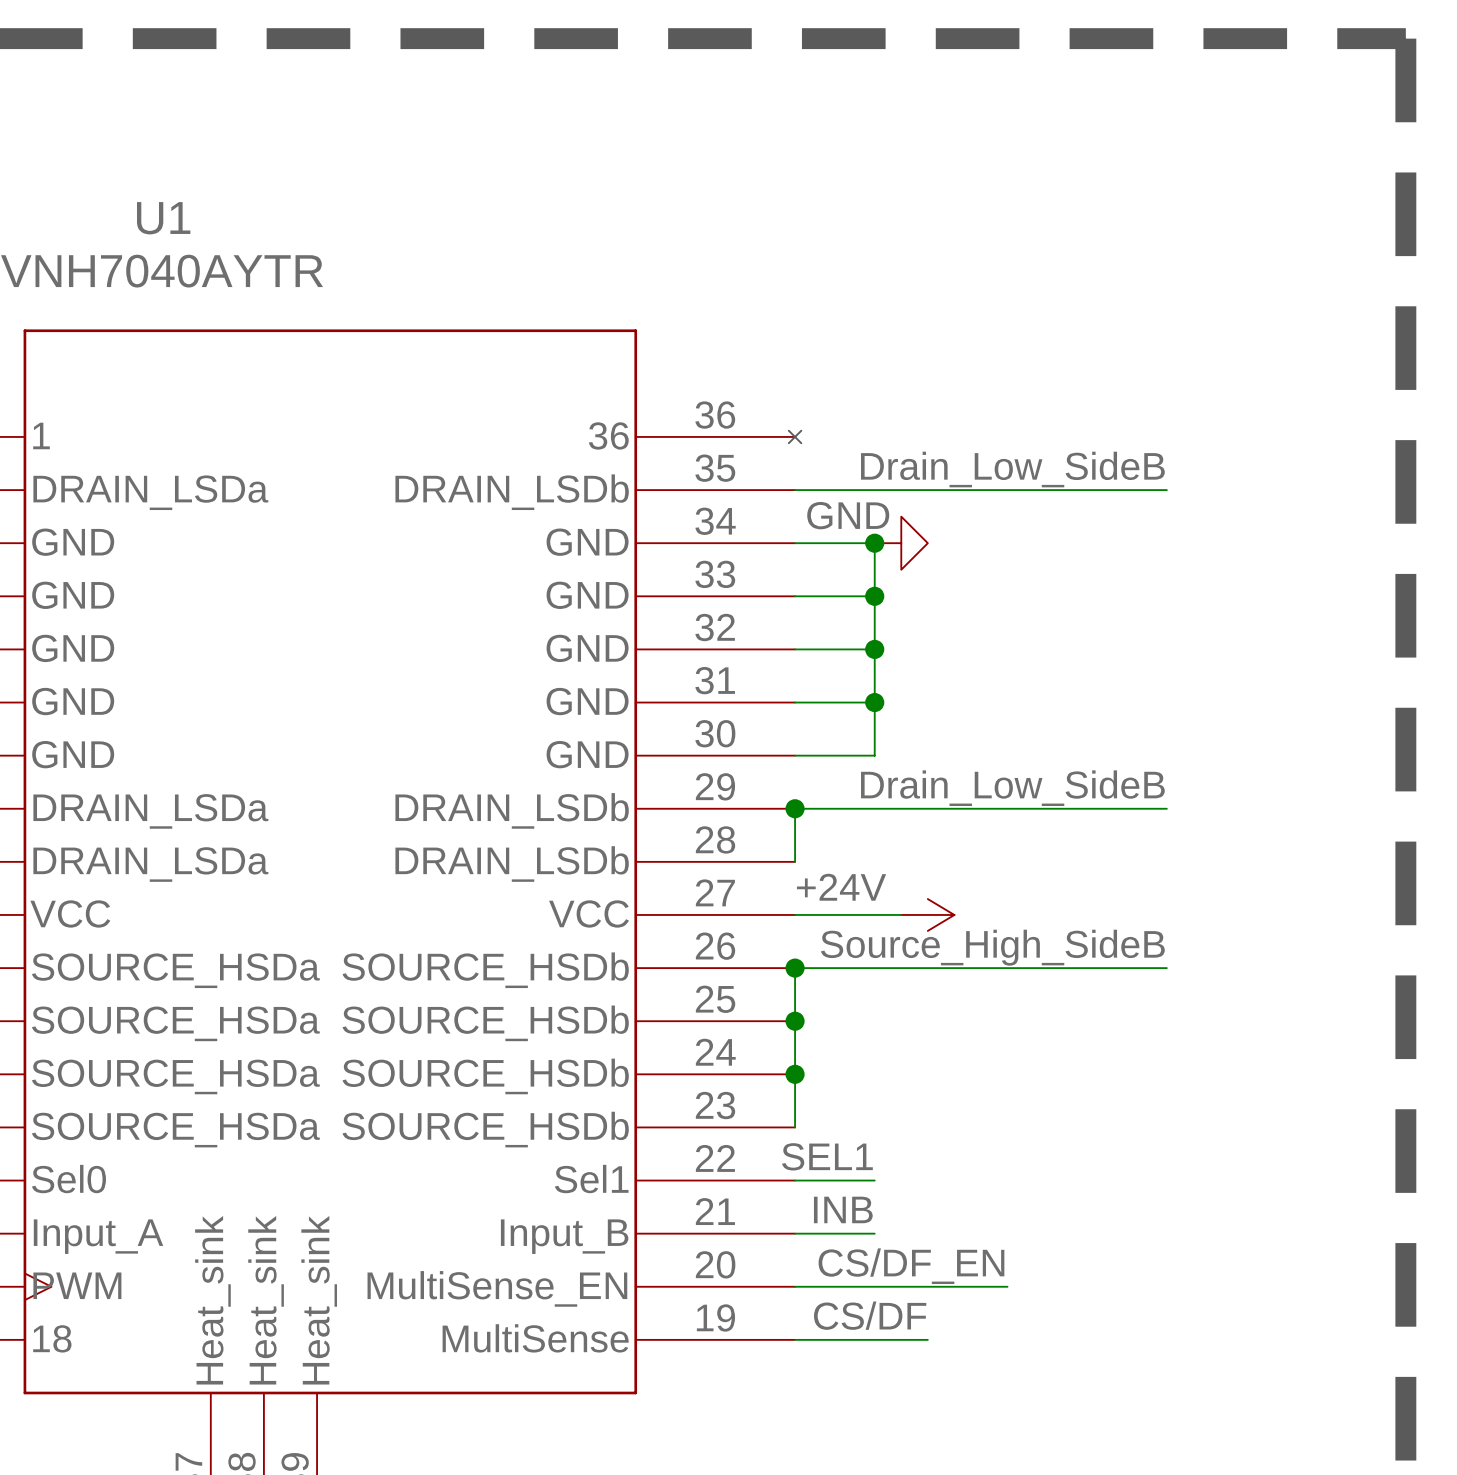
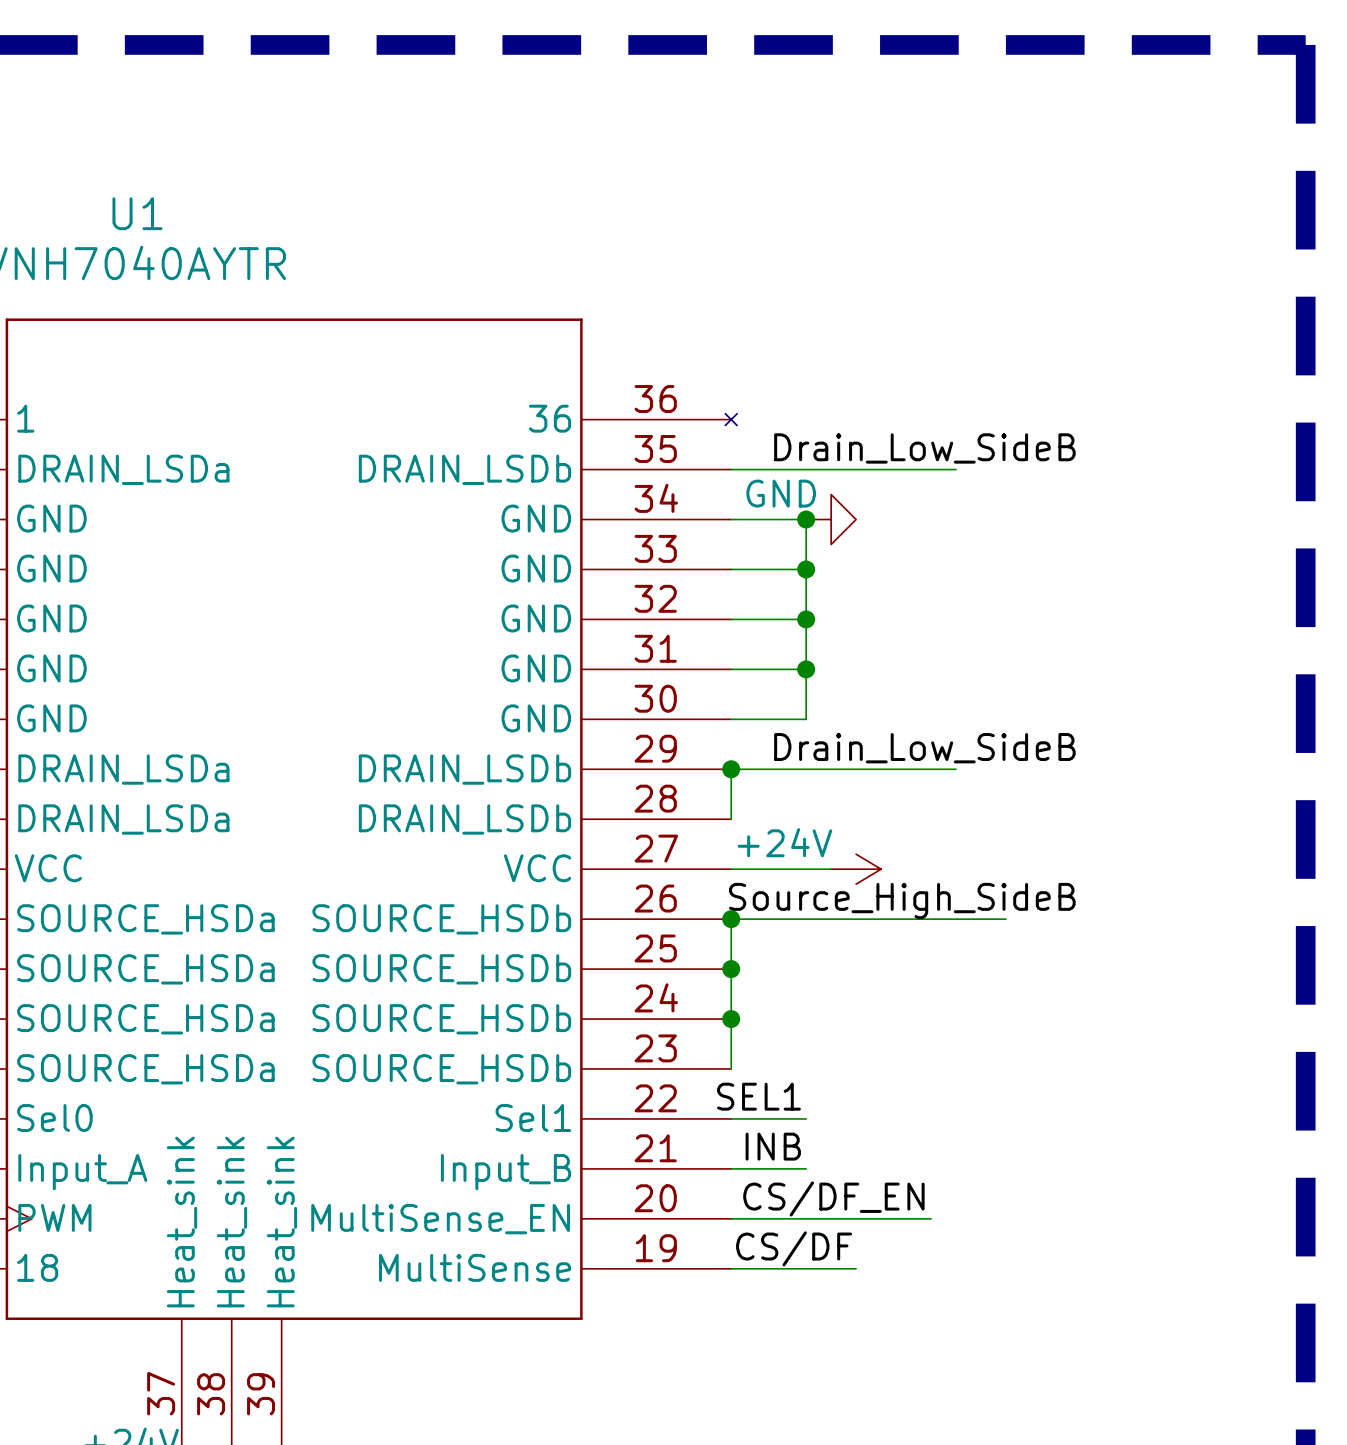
wire: (1034, 490) (1166, 490) -> none
wire: (1034, 808) (1166, 808) -> none
wire: (1087, 968) (1166, 968) -> none

